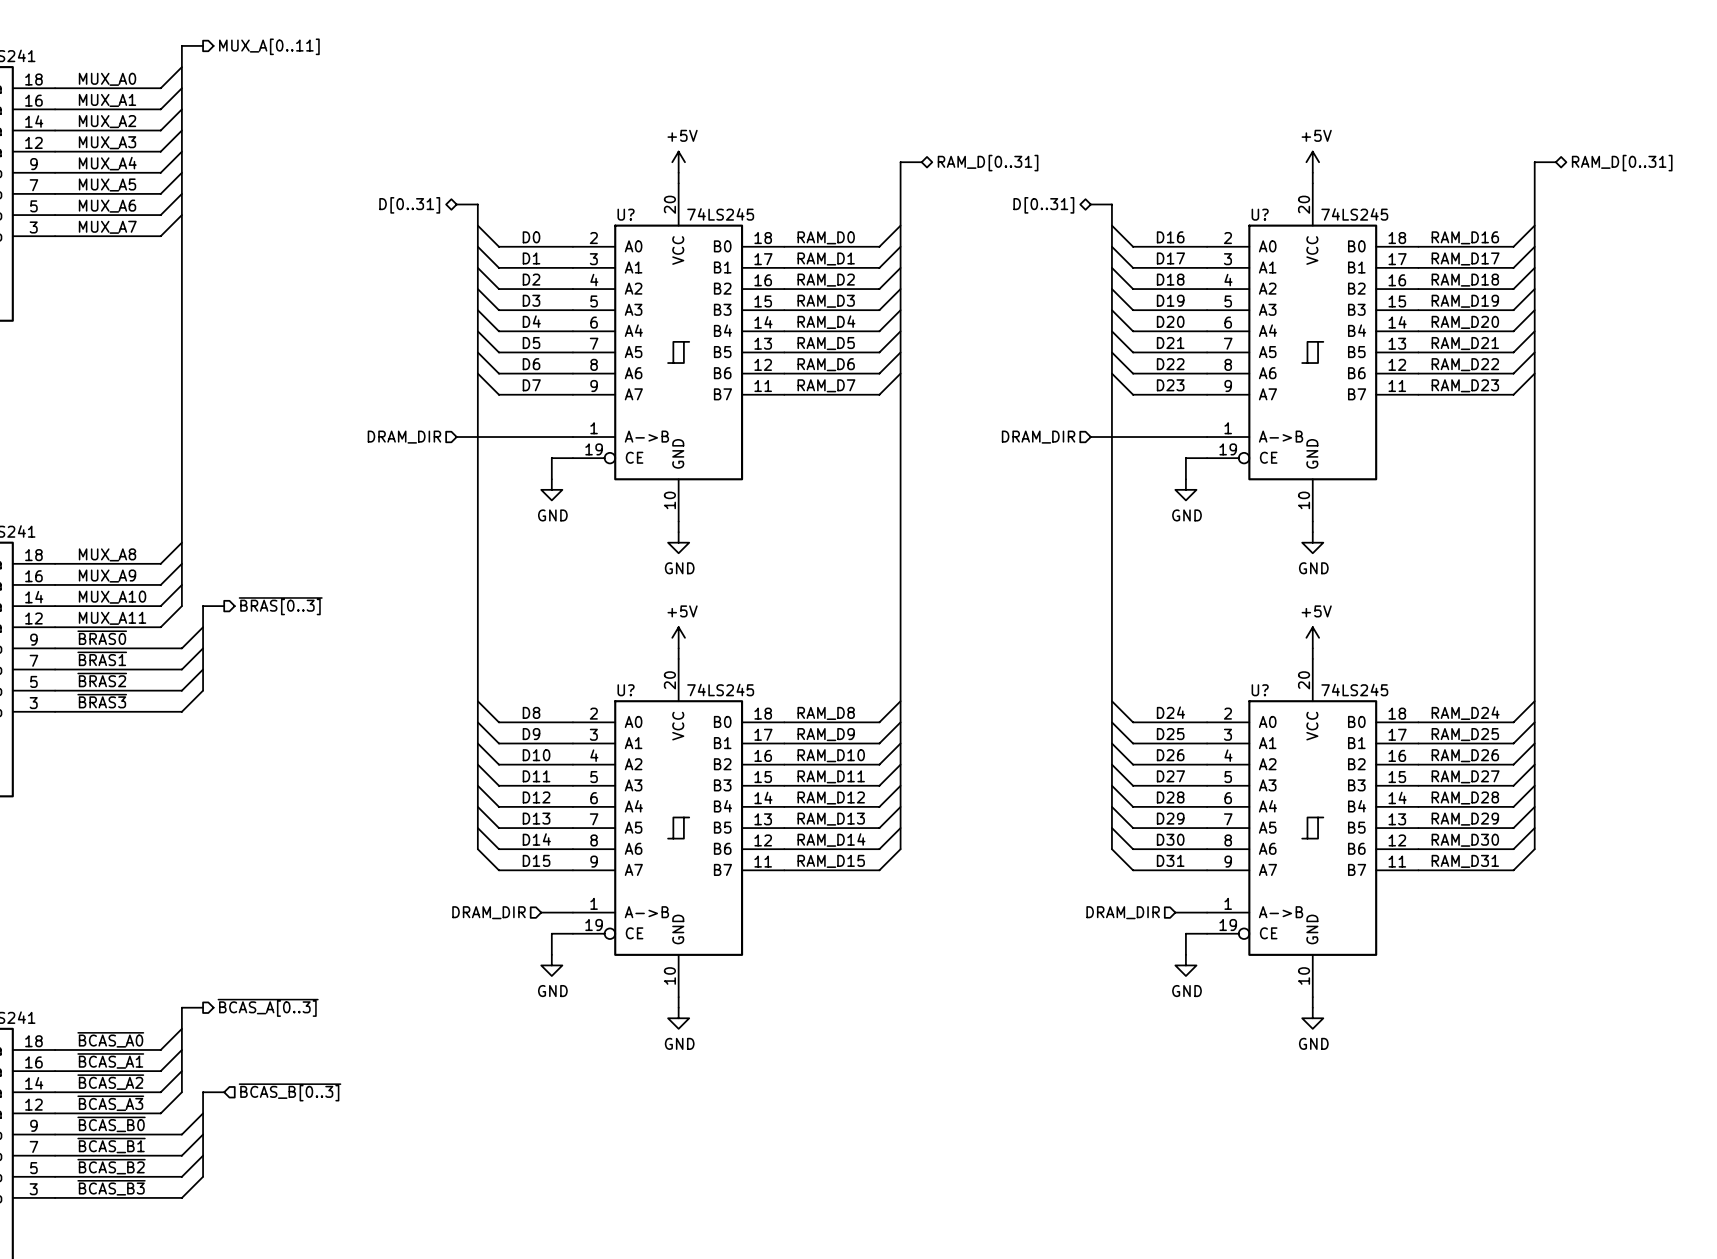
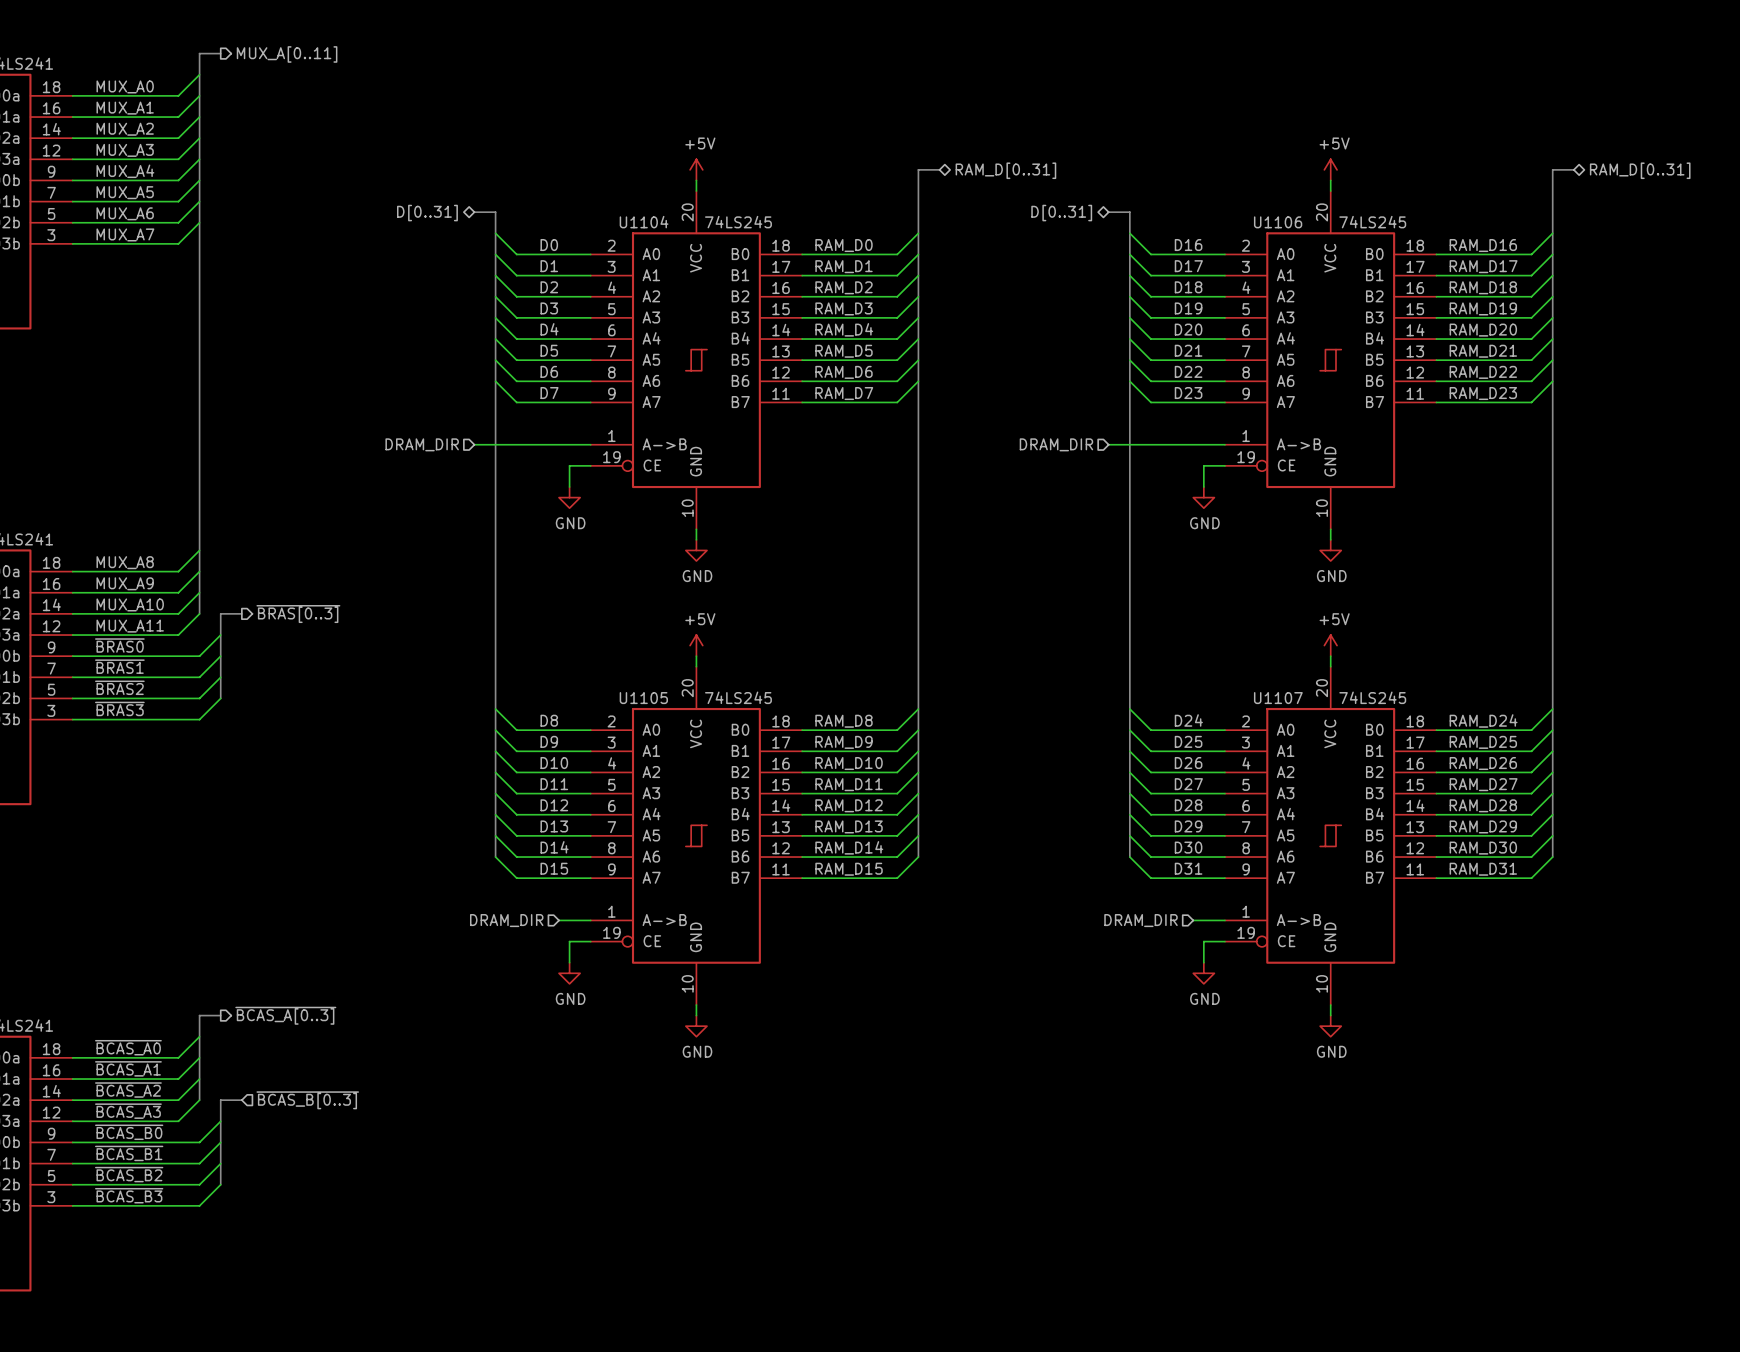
U? name: U? (626, 214) -> U1104 (644, 222)
U? name: U? (1260, 214) -> U1106 (1278, 222)
U? name: U? (626, 690) -> U1105 (643, 698)
U? name: U? (1260, 690) -> U1107 (1278, 698)

